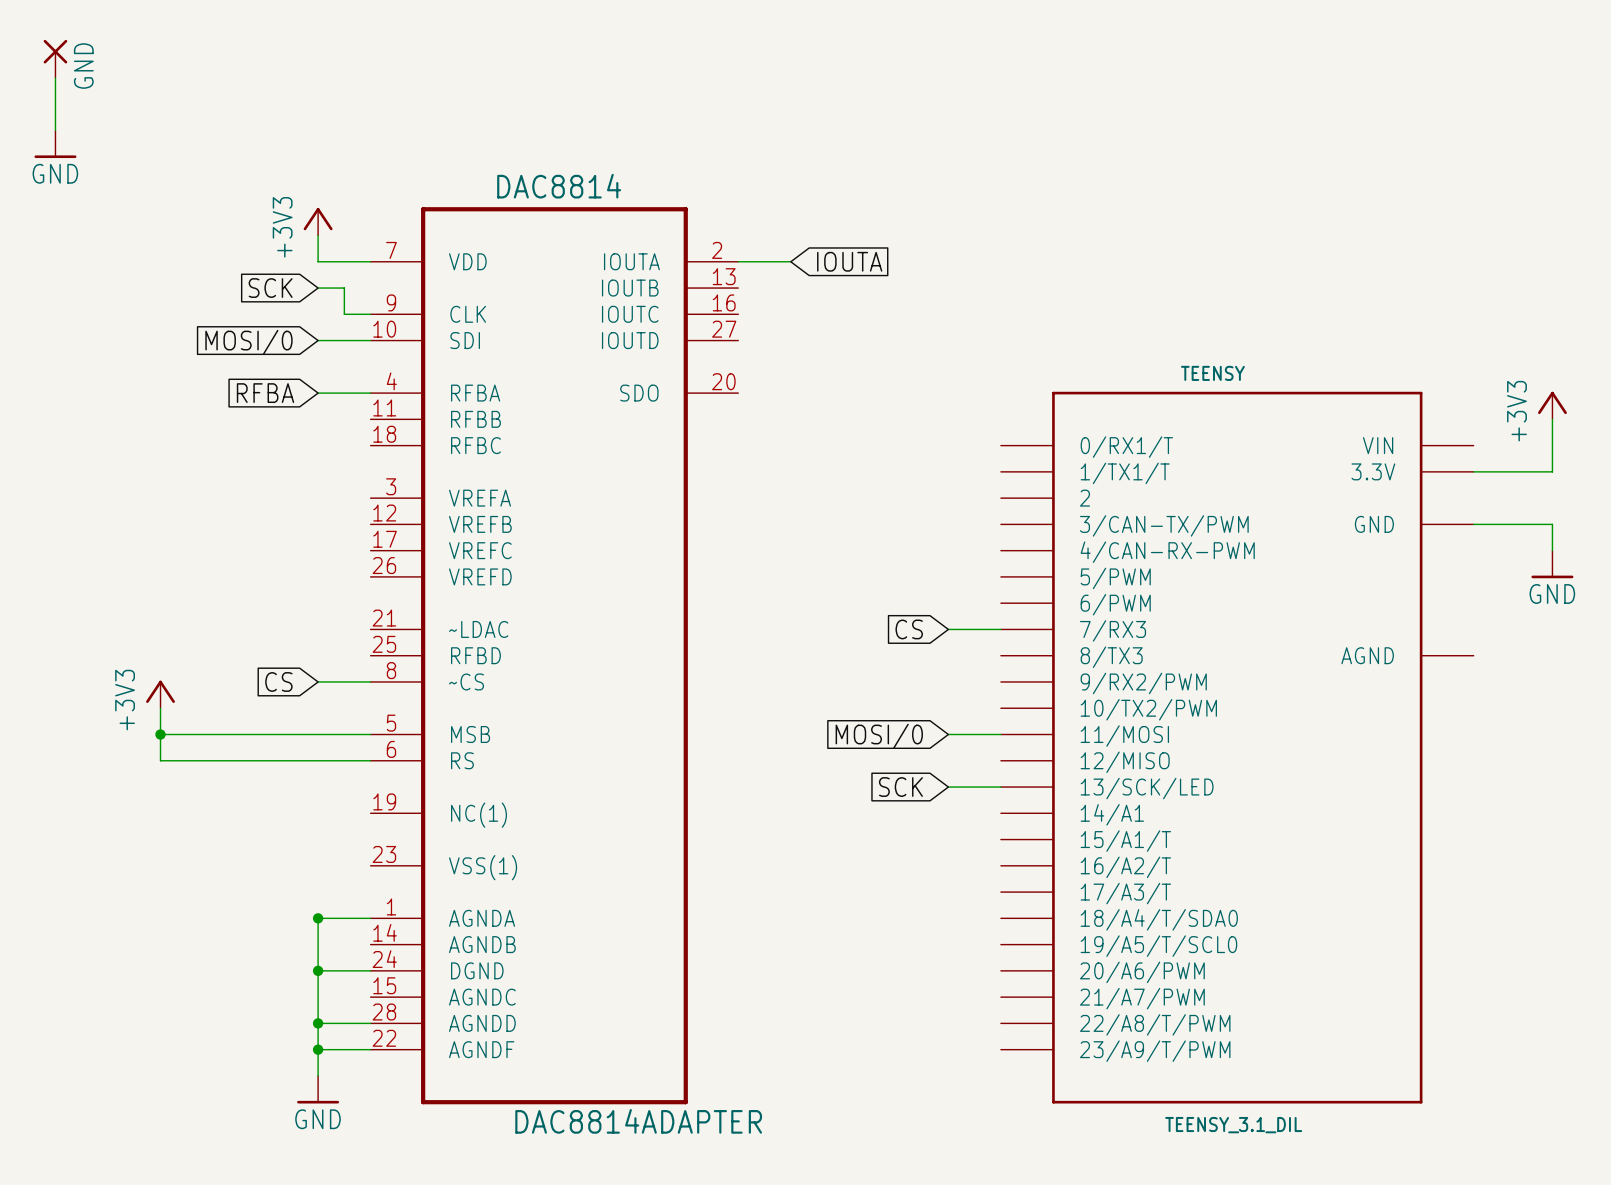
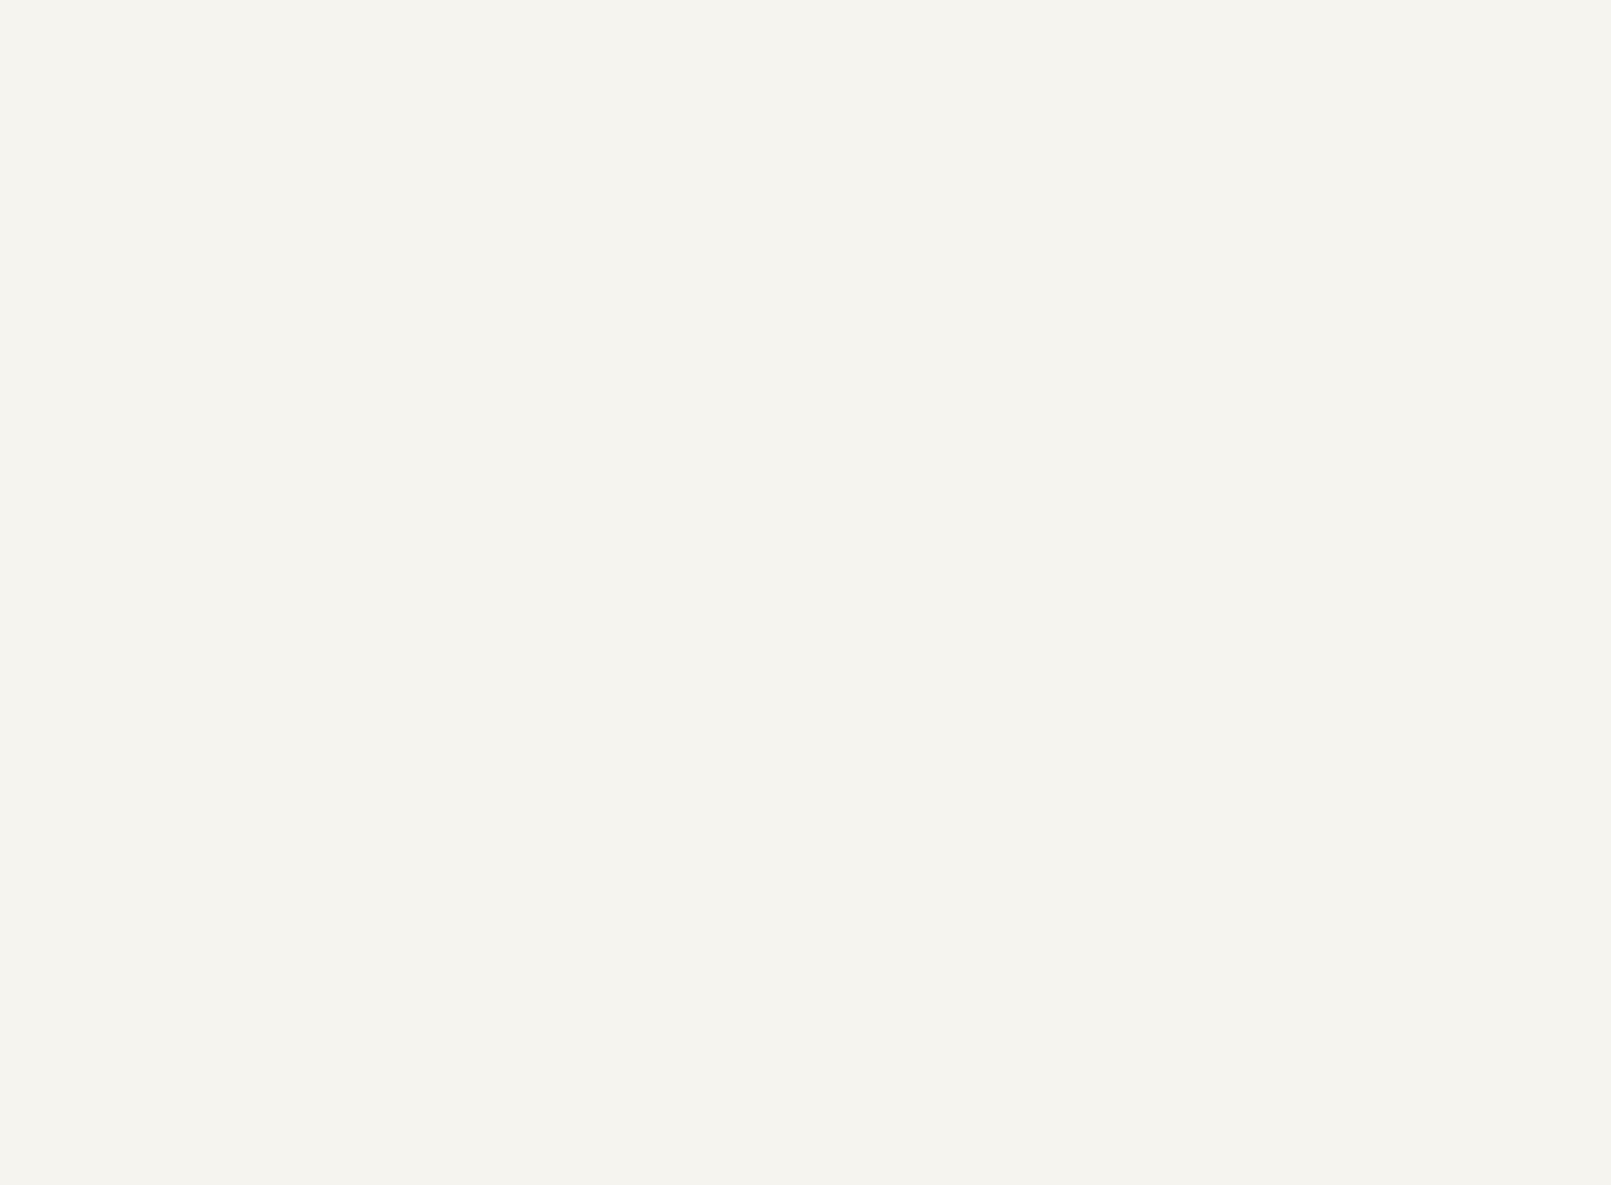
GND: (55, 58) -> none
wire: (55, 77) (55, 130) -> none
power symbol: GND (55, 144) -> none
power symbol: +3V3 (318, 221) -> none
wire: (318, 235) (318, 261) (370, 261) -> none
wire: (738, 261) (790, 261) -> none
global label: IOUTA (849, 261) -> none
global label: SCK (270, 288) -> none
wire: (318, 288) (344, 288) (344, 314) (370, 314) -> none
wire: (318, 340) (370, 340) -> none
global label: MOSI/0 (248, 342) -> none
global label: RFBA (265, 393) -> none
wire: (318, 393) (370, 393) -> none
power symbol: +3V3 (1552, 405) -> none
wire: (1552, 419) (1552, 471) (1473, 471) -> none
wire: (1473, 524) (1552, 524) (1552, 550) -> none
power symbol: GND (1552, 564) -> none
global label: CS (909, 629) -> none
wire: (948, 629) (1000, 629) -> none
DAC8814: DAC8814ADAPTER (554, 655) -> none
global label: CS (278, 681) -> none
wire: (318, 681) (370, 681) -> none
power symbol: +3V3 (160, 694) -> none
wire: (160, 708) (160, 760) (370, 760) -> none
wire: (160, 734) (370, 734) -> none
junction: (160, 734) -> none
wire: (948, 734) (1000, 734) -> none
global label: MOSI/0 (879, 736) -> none
TEENSY: TEENSY_3.1_DIL (1237, 747) -> none
global label: SCK (900, 787) -> none
wire: (948, 787) (1000, 787) -> none
junction: (318, 918) -> none
wire: (370, 918) (318, 918) (318, 1075) -> none
wire: (318, 970) (370, 970) -> none
junction: (318, 970) -> none
wire: (318, 1023) (370, 1023) -> none
junction: (318, 1023) -> none
wire: (318, 1049) (370, 1049) -> none
junction: (318, 1049) -> none
power symbol: GND (318, 1089) -> none

